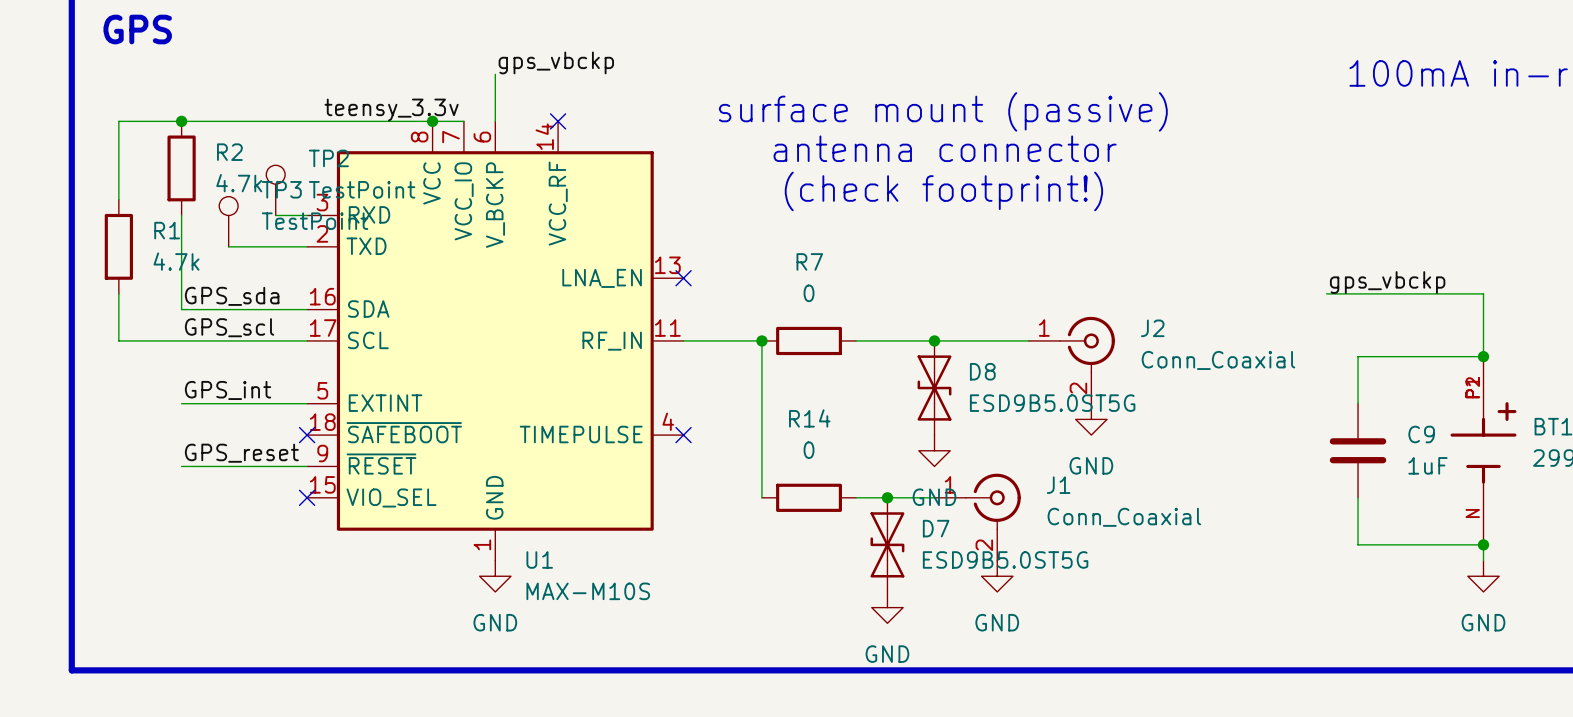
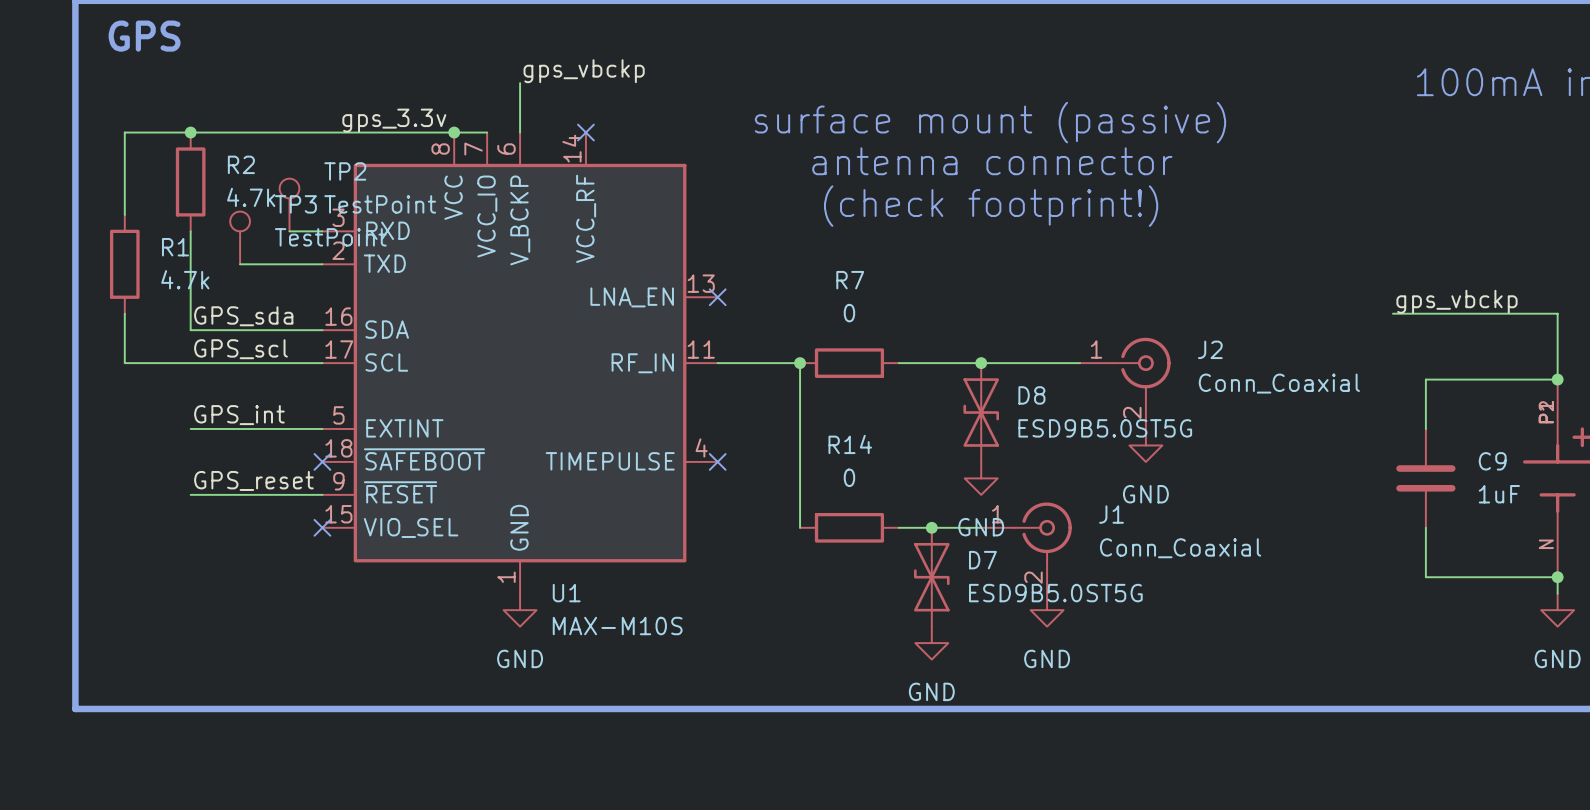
label: teensy_3.3v (391, 109) -> gps_3.3v (394, 120)

